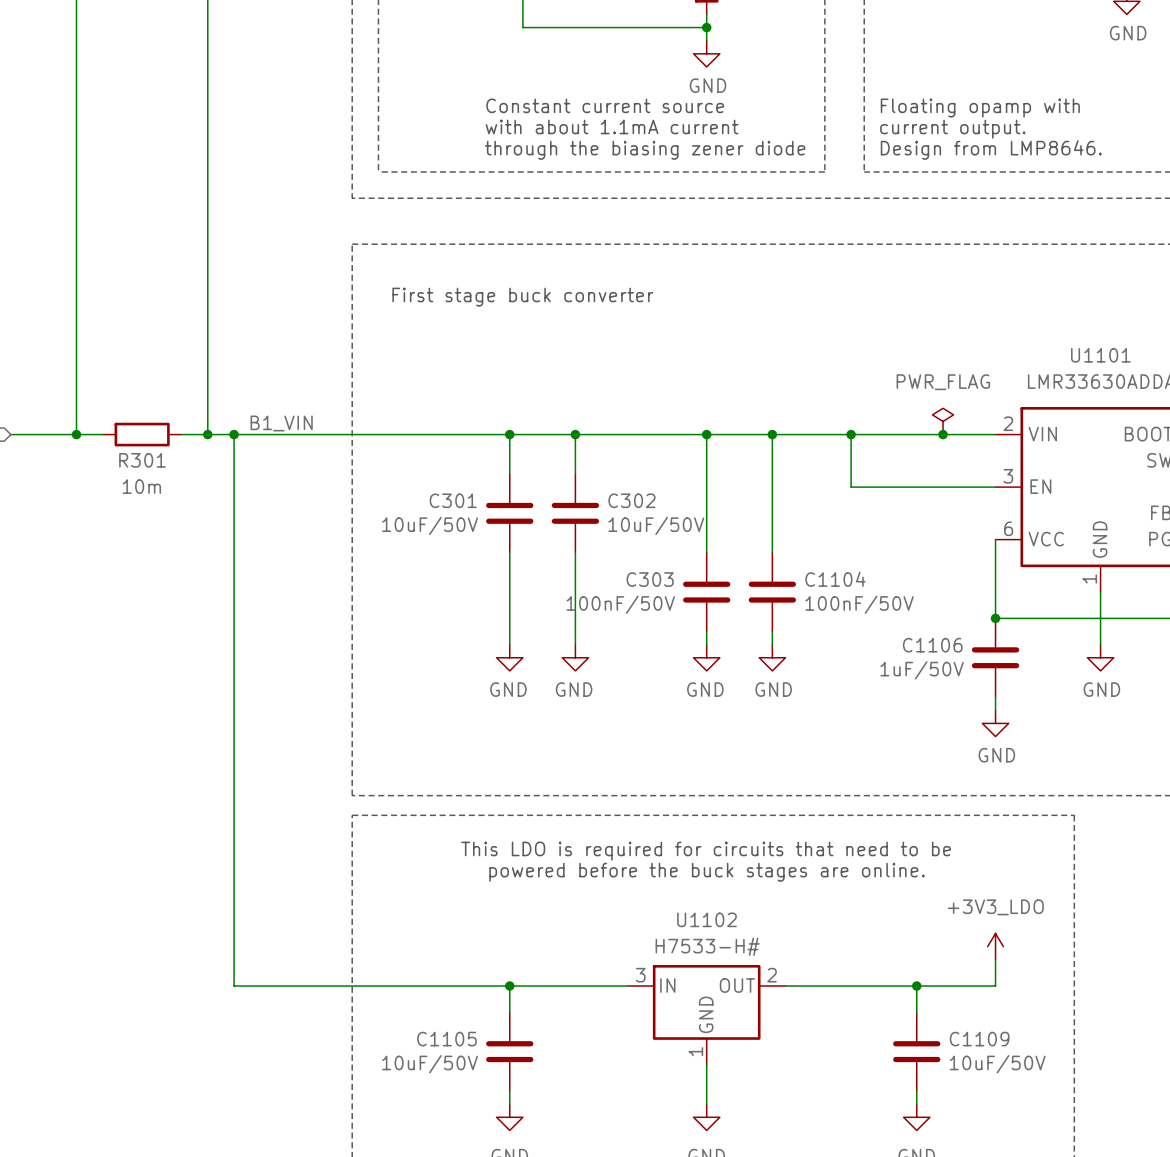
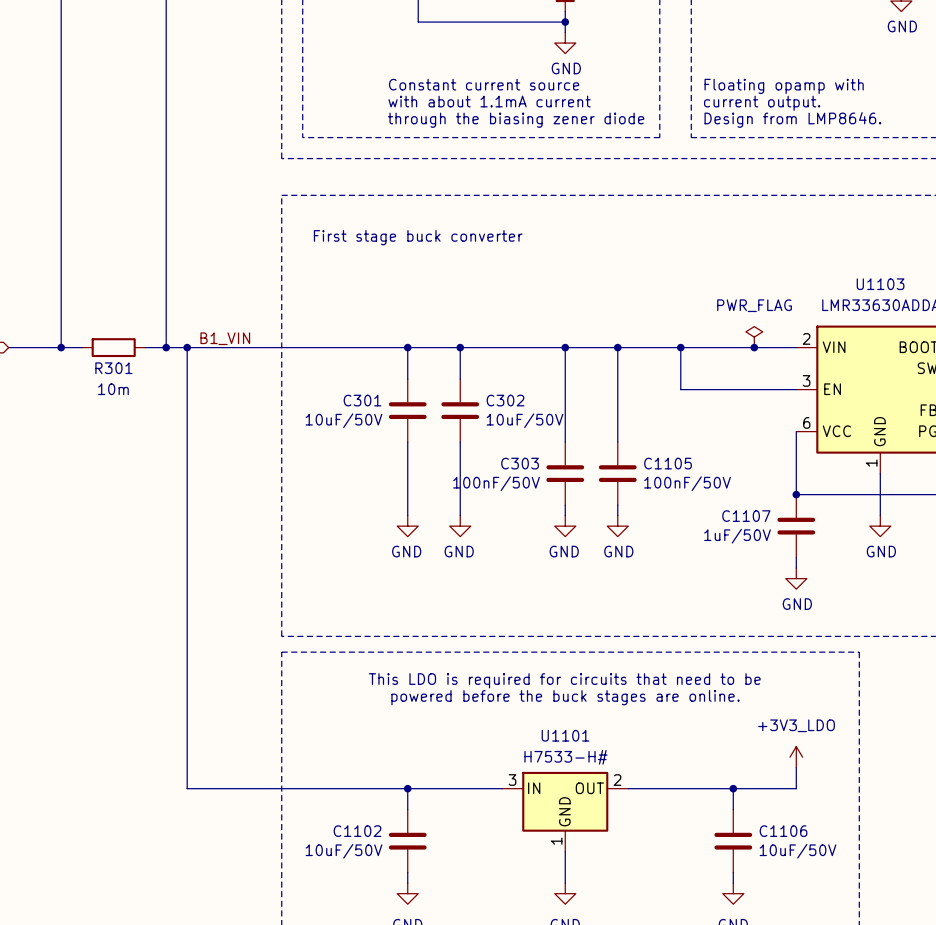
U1101 name: U1101 (1100, 355) -> U1103 (880, 284)
C1104 name: C1104 (835, 579) -> C1105 (668, 463)
C1106 name: C1106 (932, 645) -> C1107 (746, 516)
U1102 name: U1102 (707, 919) -> U1101 (565, 735)
C1105 name: C1105 (446, 1039) -> C1102 (357, 831)
C1109 name: C1109 (979, 1039) -> C1106 (783, 831)

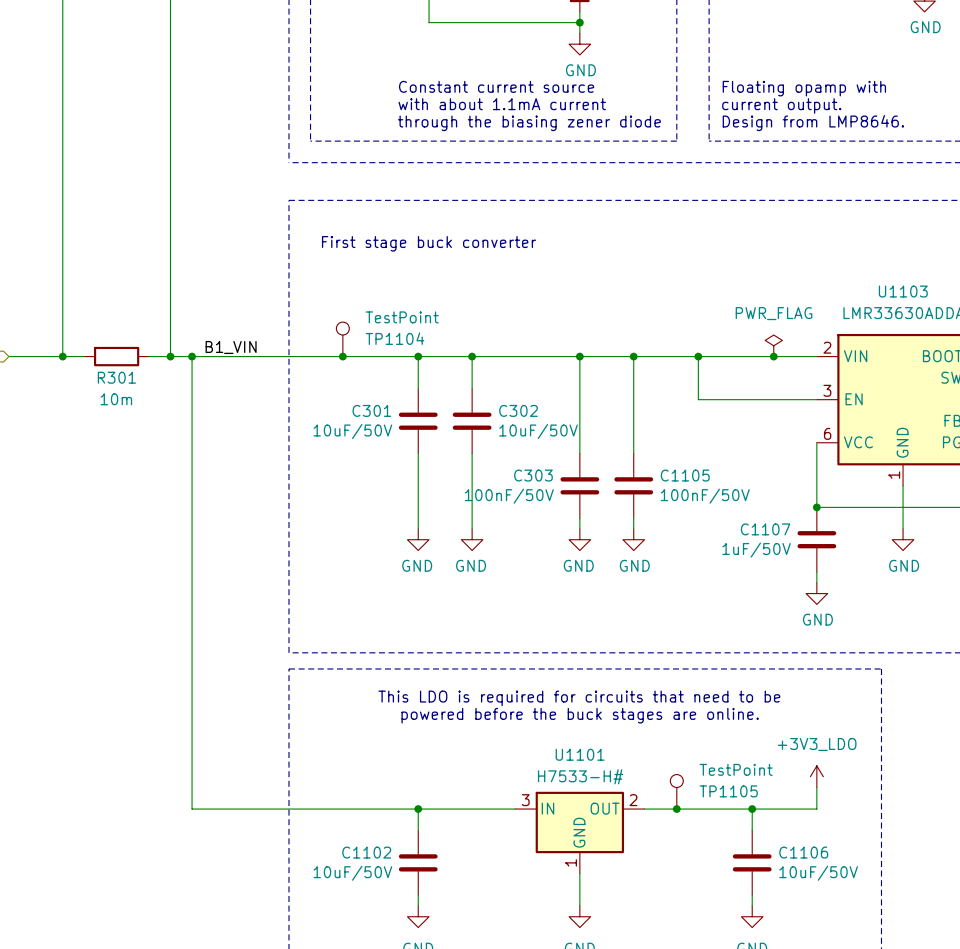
TP1104: none -> TestPoint (342, 339)
junction: none -> (342, 356)
TP1105: none -> TestPoint (676, 791)
junction: none -> (676, 809)

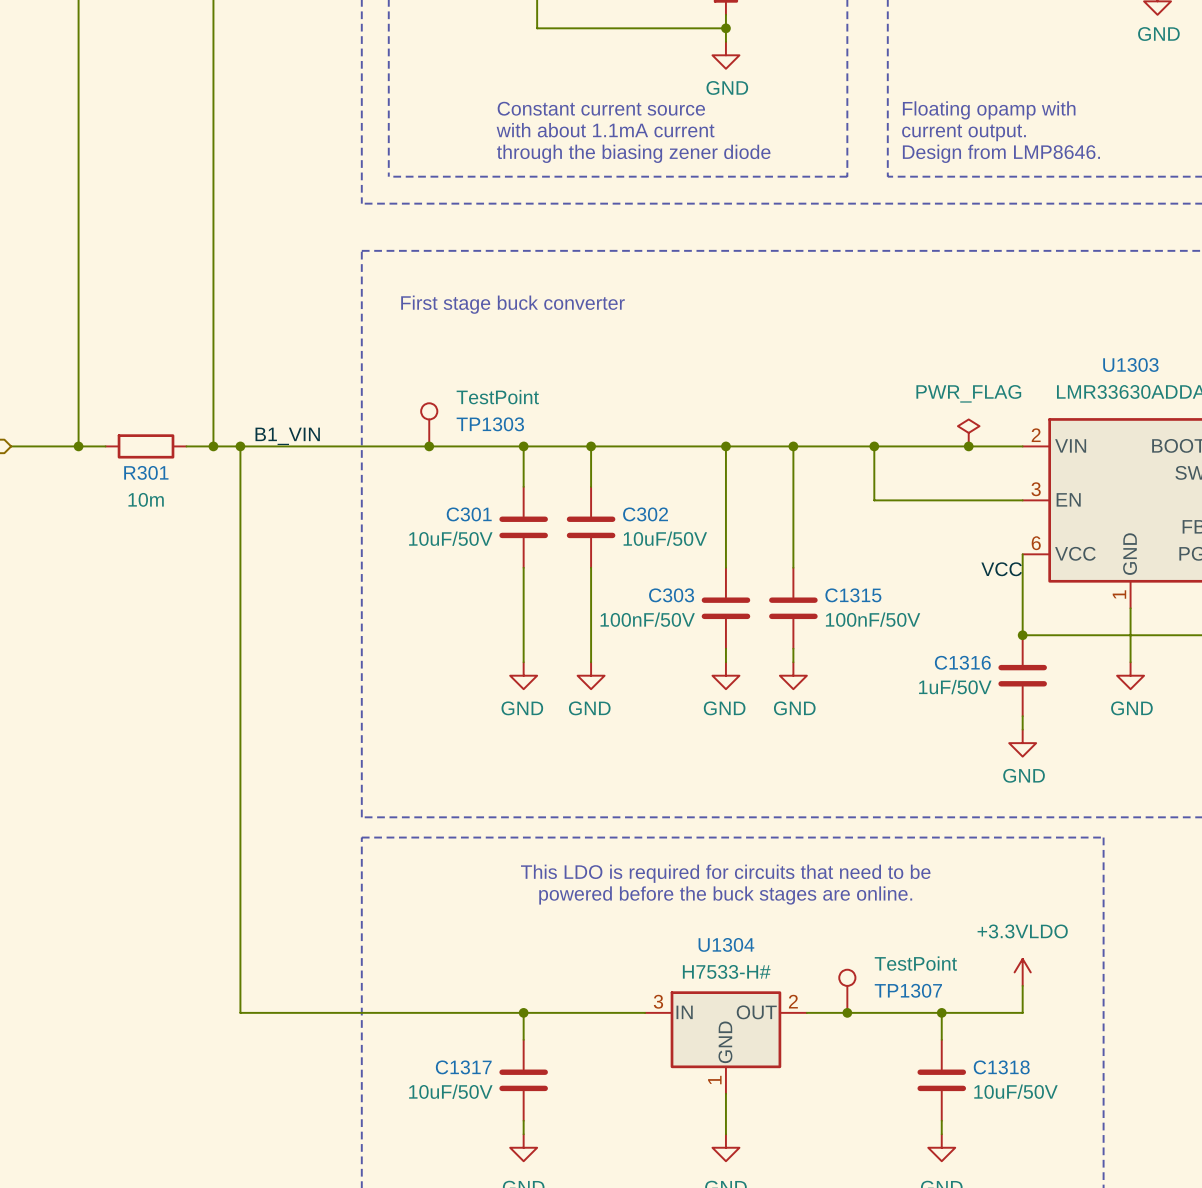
U1103 name: U1103 (903, 291) -> U1303 (1130, 364)
TP1104 name: TP1104 (395, 338) -> TP1303 (490, 424)
label: none -> VCC (1001, 569)
C1105 name: C1105 (685, 475) -> C1315 (853, 595)
C1107 name: C1107 (765, 529) -> C1316 (962, 662)
U1101 name: U1101 (580, 754) -> U1304 (726, 944)
power symbol: +3V3_LDO (816, 776) -> +3.3VLDO (1022, 972)
TP1105 name: TP1105 (728, 791) -> TP1307 (908, 990)
C1102 name: C1102 (366, 852) -> C1317 (463, 1067)
C1106 name: C1106 (803, 852) -> C1318 (1001, 1067)

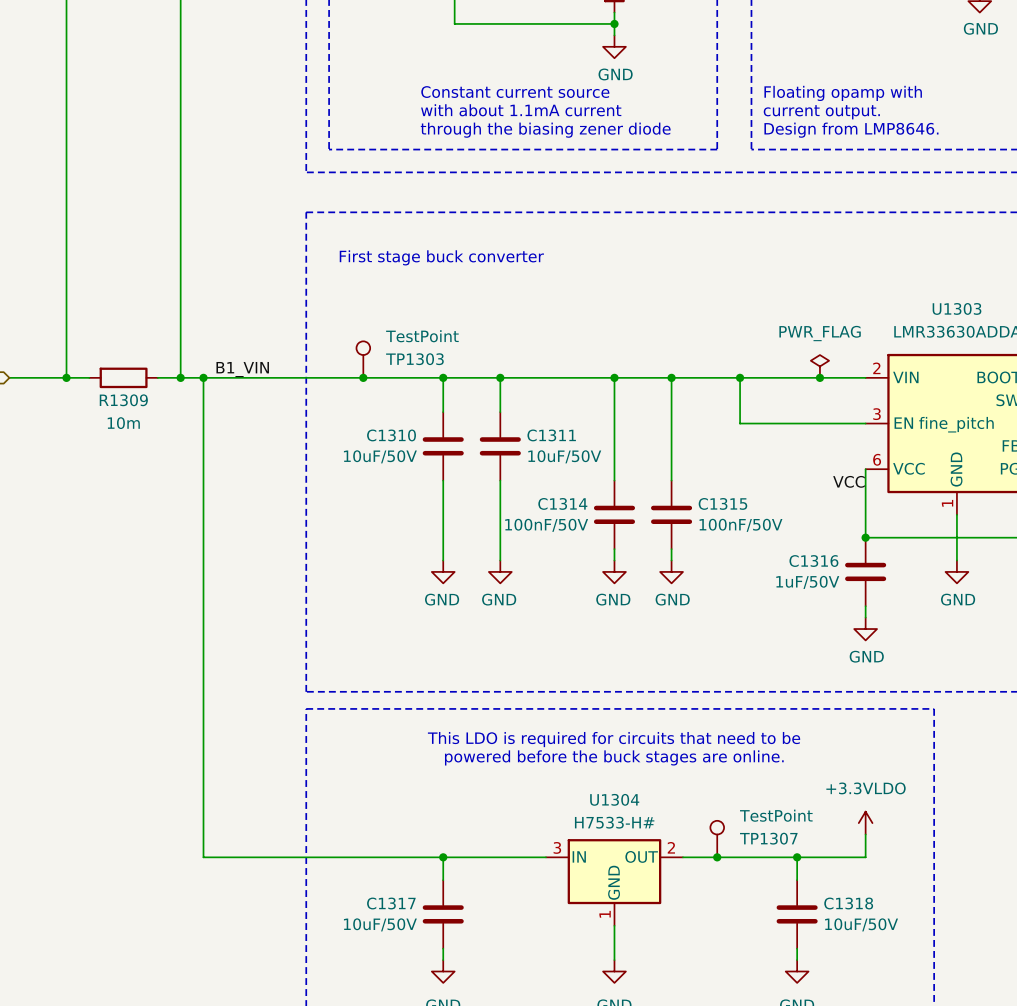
R301 name: R301 (146, 472) -> R1309 (123, 400)
U1303 text: none -> fine_pitch (956, 424)
C301 name: C301 (469, 514) -> C1310 (391, 435)
C302 name: C302 (645, 514) -> C1311 (551, 435)
C303 name: C303 (671, 595) -> C1314 (562, 503)

